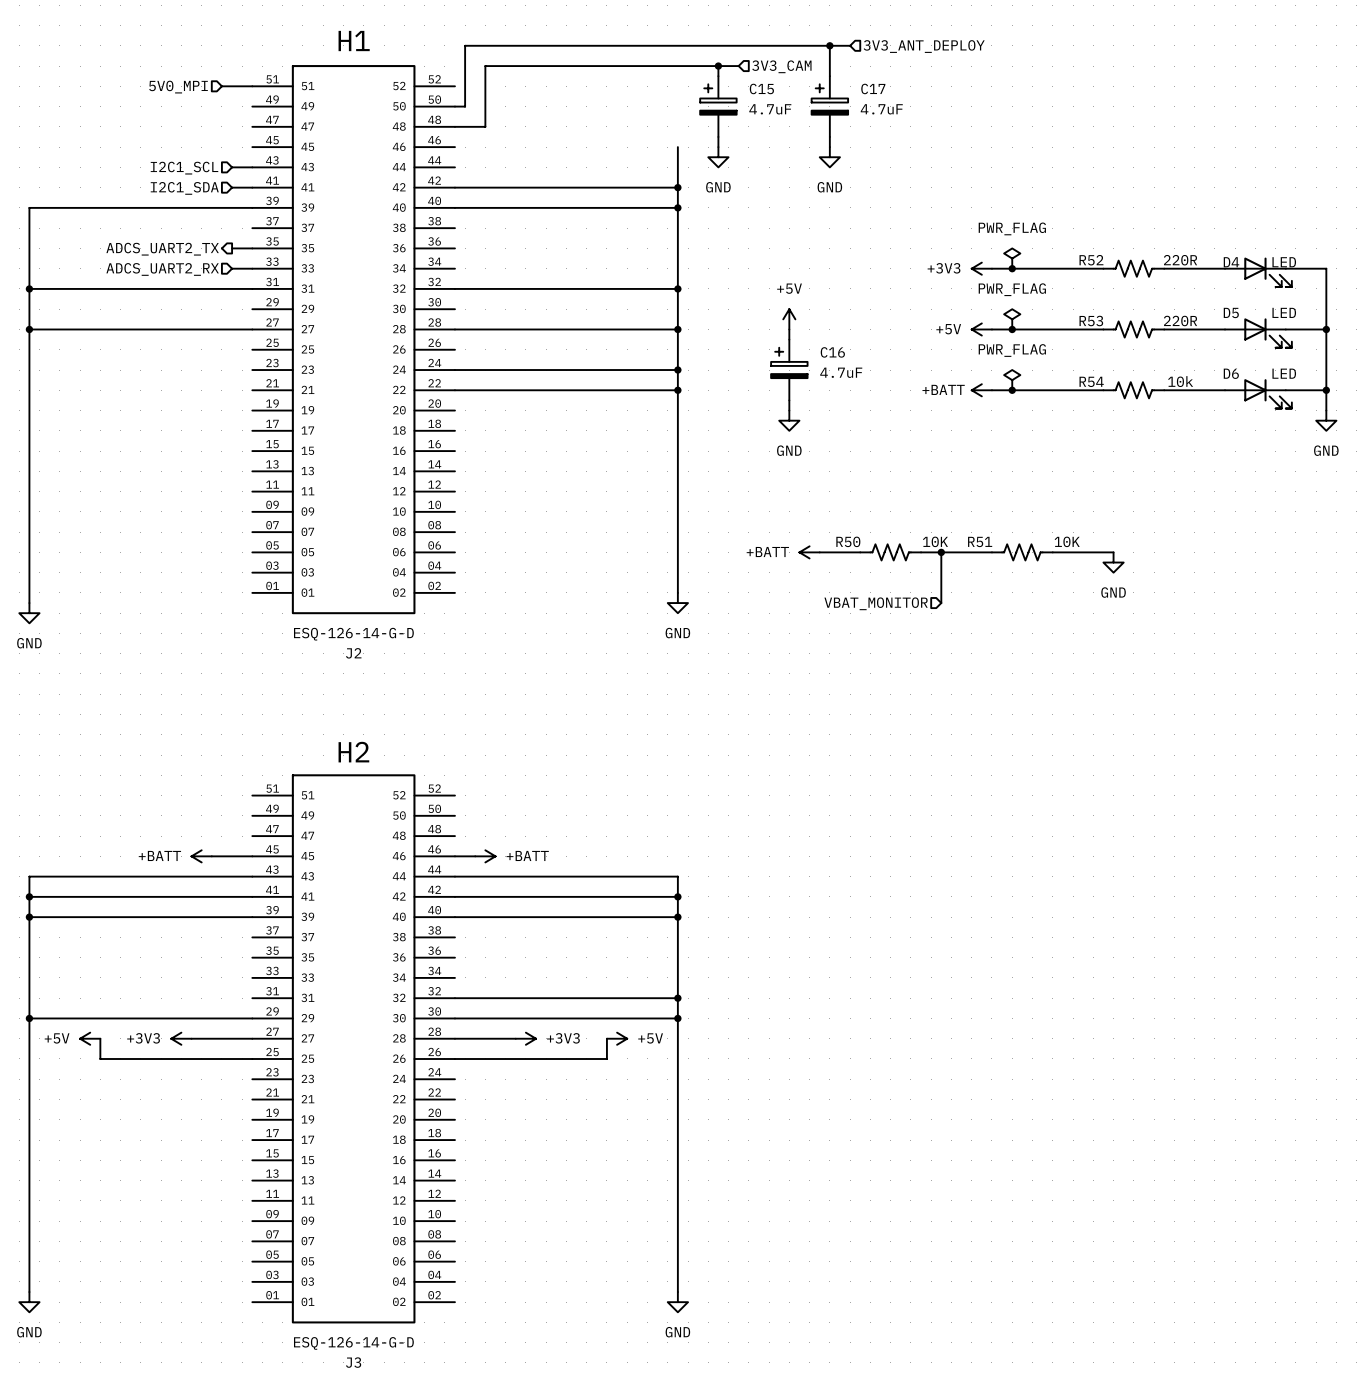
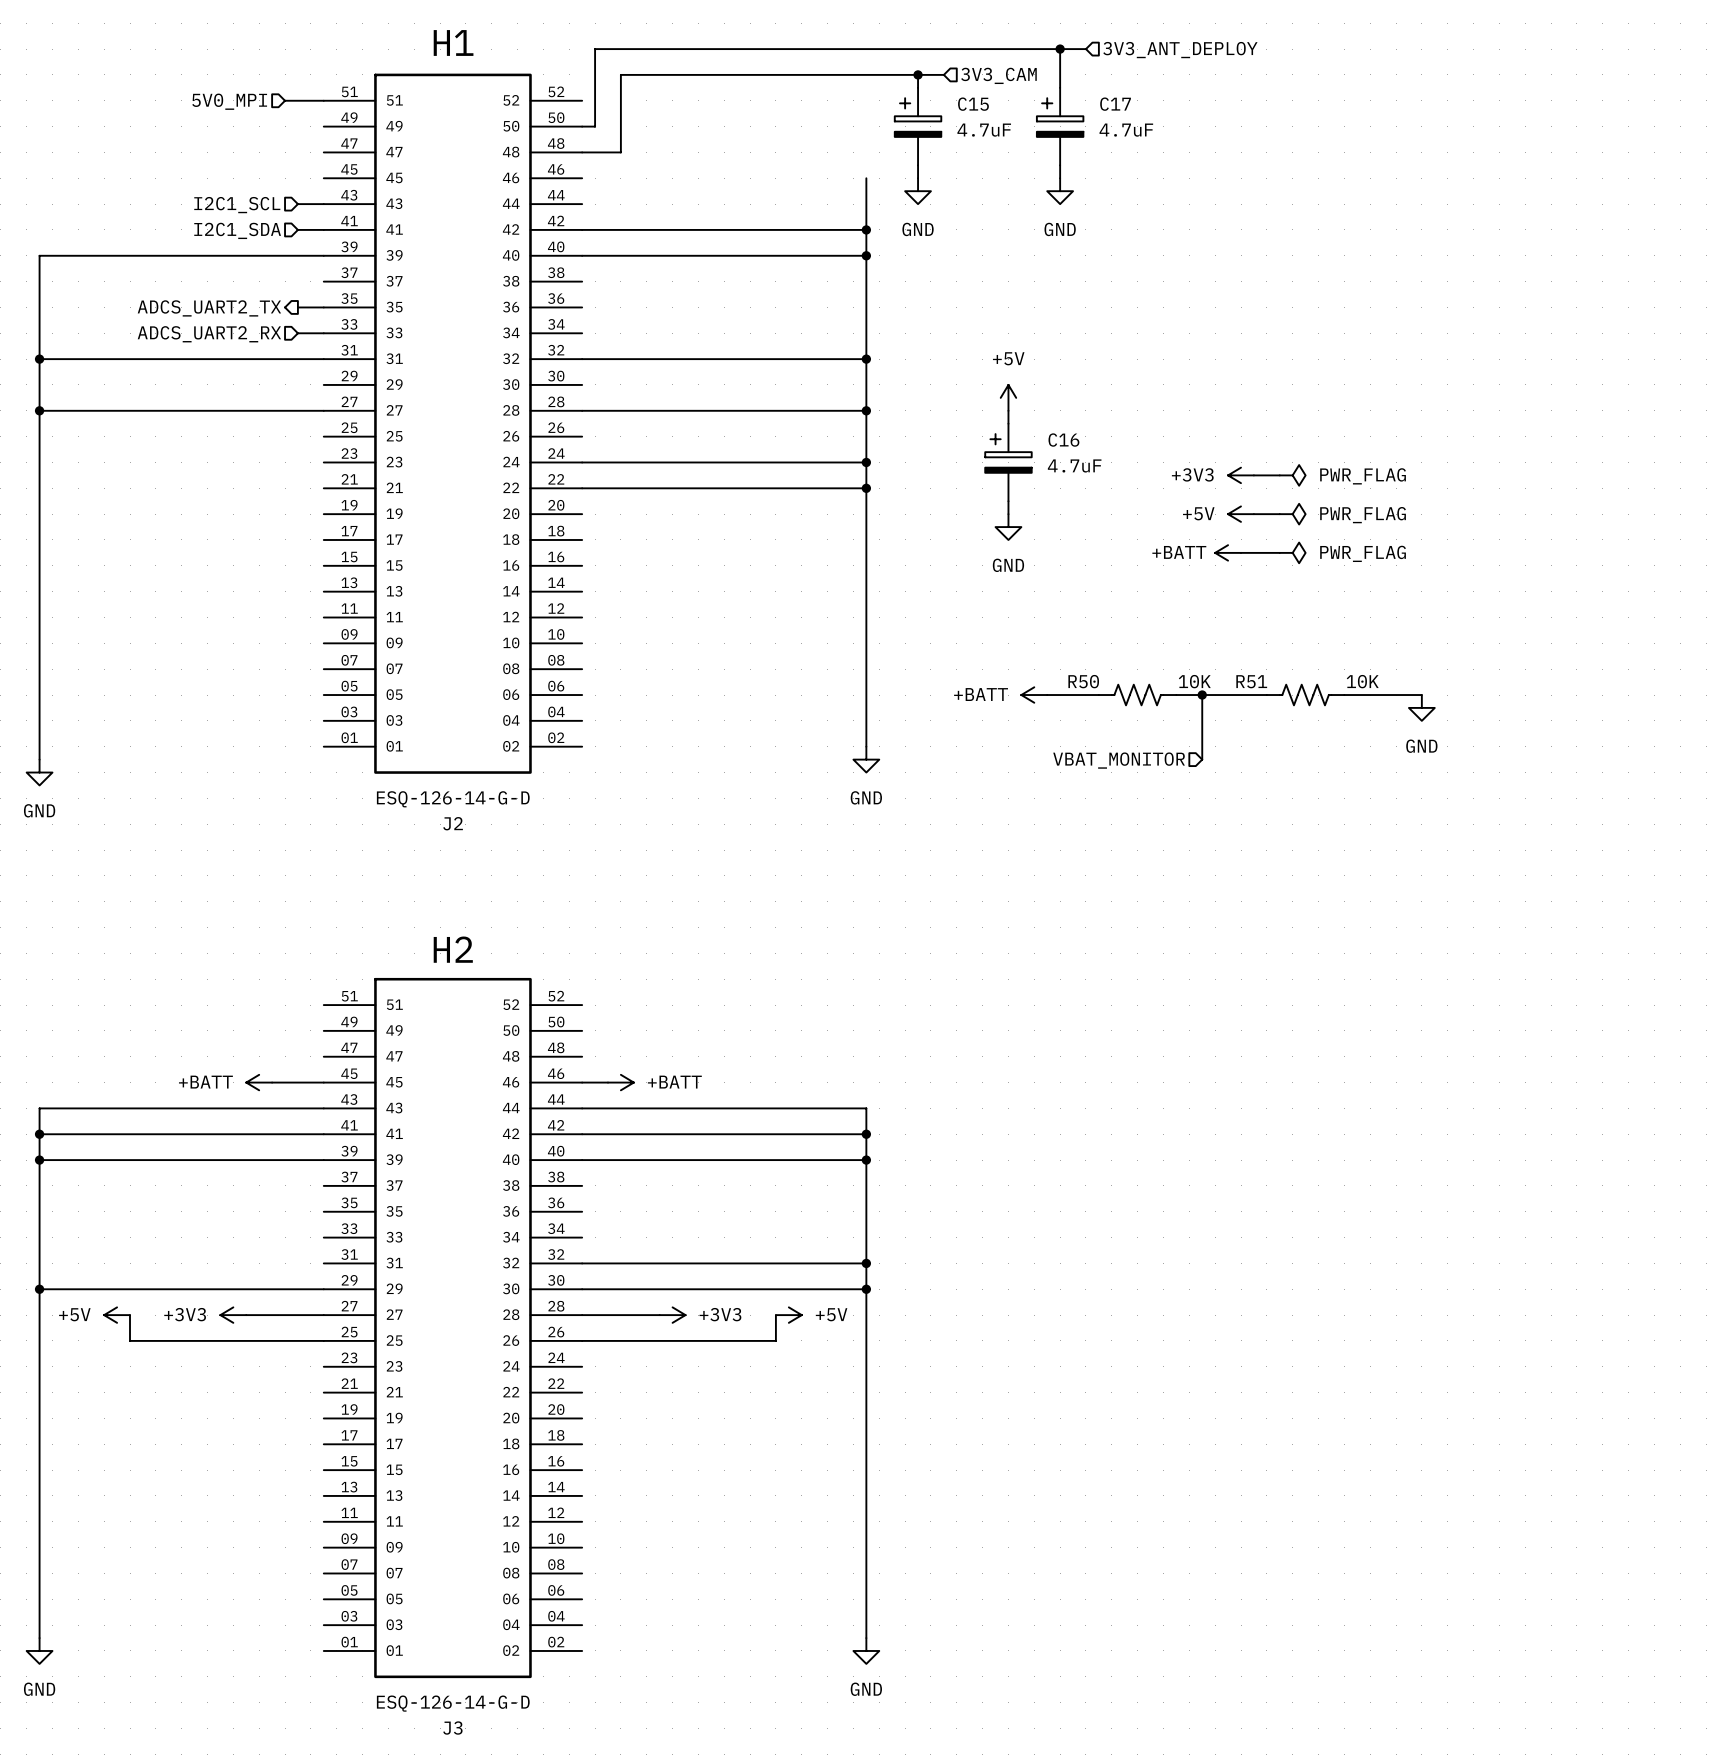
power symbol: PWR_FLAG (1012, 258) -> none
power symbol position: +3V3 (981, 268) -> +3V3 (1241, 475)
wire: (991, 268) (1103, 268) -> none
junction: (1012, 268) -> none
R52: 220R (1133, 268) -> none
wire: (1164, 268) (1225, 268) -> none
wire: (1285, 268) (1326, 268) (1326, 410) -> none
D4: LED (1258, 272) -> none
power symbol: PWR_FLAG (1012, 319) -> none
power symbol position: +5V (981, 329) -> +5V (1241, 514)
wire: (991, 329) (1103, 329) -> none
junction: (1012, 329) -> none
R53: 220R (1133, 329) -> none
wire: (1164, 329) (1225, 329) -> none
wire: (1285, 329) (1326, 329) -> none
junction: (1326, 329) -> none
D5: LED (1258, 333) -> none
power symbol text position: PWR_FLAG (1012, 350) -> PWR_FLAG (1363, 476)
wire: none -> (1253, 475) (1279, 475)
power symbol rotation: 0° (1012, 380) -> 90° clockwise (1292, 475)
power symbol position: +BATT (981, 390) -> +BATT (1228, 552)
wire: (991, 390) (1103, 390) -> none
junction: (1012, 390) -> none
R54: 10k (1133, 390) -> none
wire: (1164, 390) (1225, 390) -> none
wire: (1285, 390) (1326, 390) -> none
junction: (1326, 390) -> none
D6: LED (1258, 393) -> none
wire: none -> (1253, 514) (1279, 514)
power symbol: none -> PWR_FLAG (1292, 514)
power symbol: GND (1326, 420) -> none
wire: none -> (1241, 552) (1279, 552)
power symbol: none -> PWR_FLAG (1292, 552)

